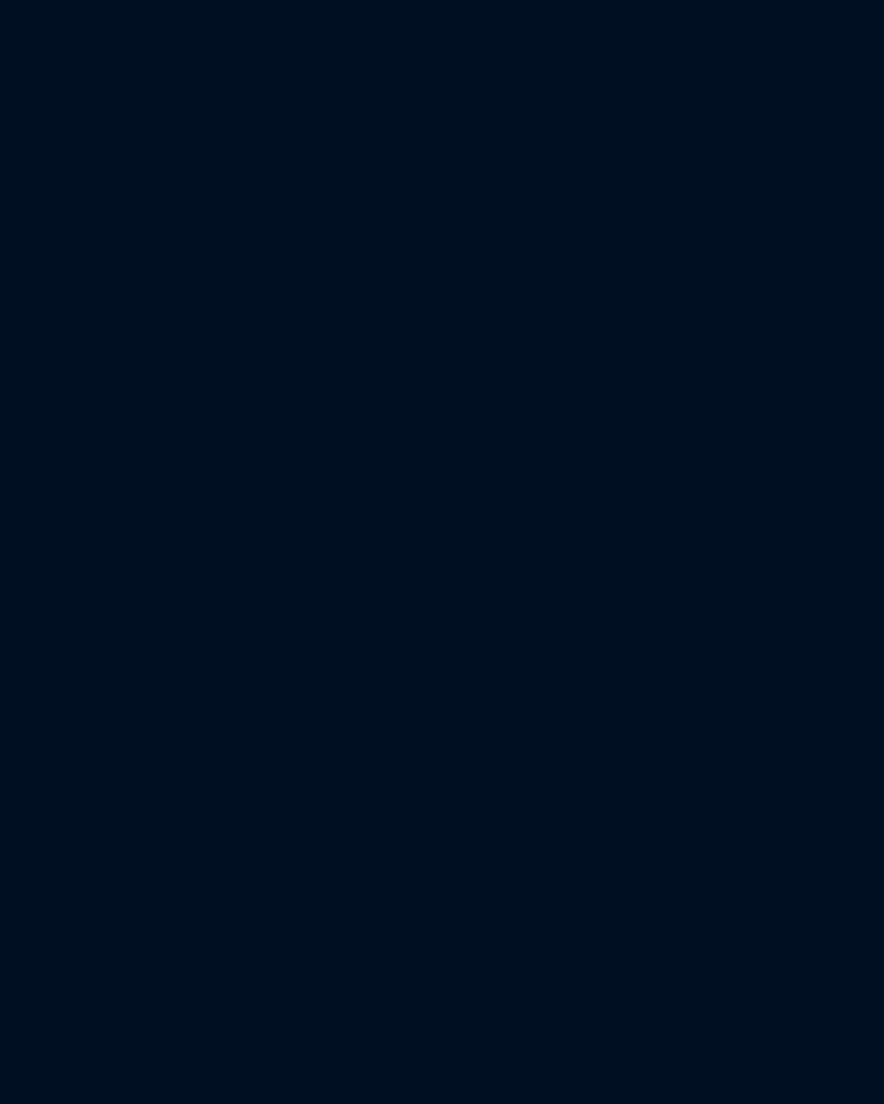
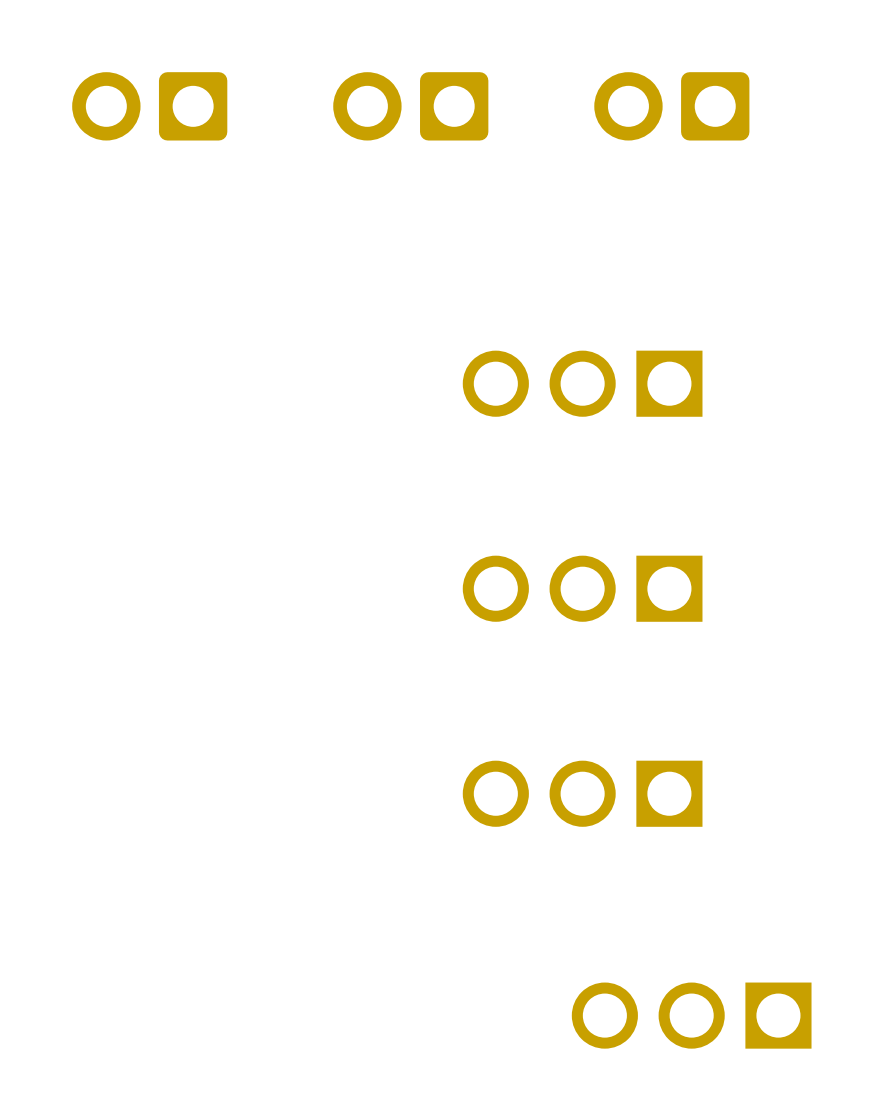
part: none -> (149, 106)
part: none -> (410, 106)
part: none -> (671, 106)
part: none -> (582, 383)
part: none -> (582, 588)
part: none -> (582, 793)
part: none -> (691, 1015)

